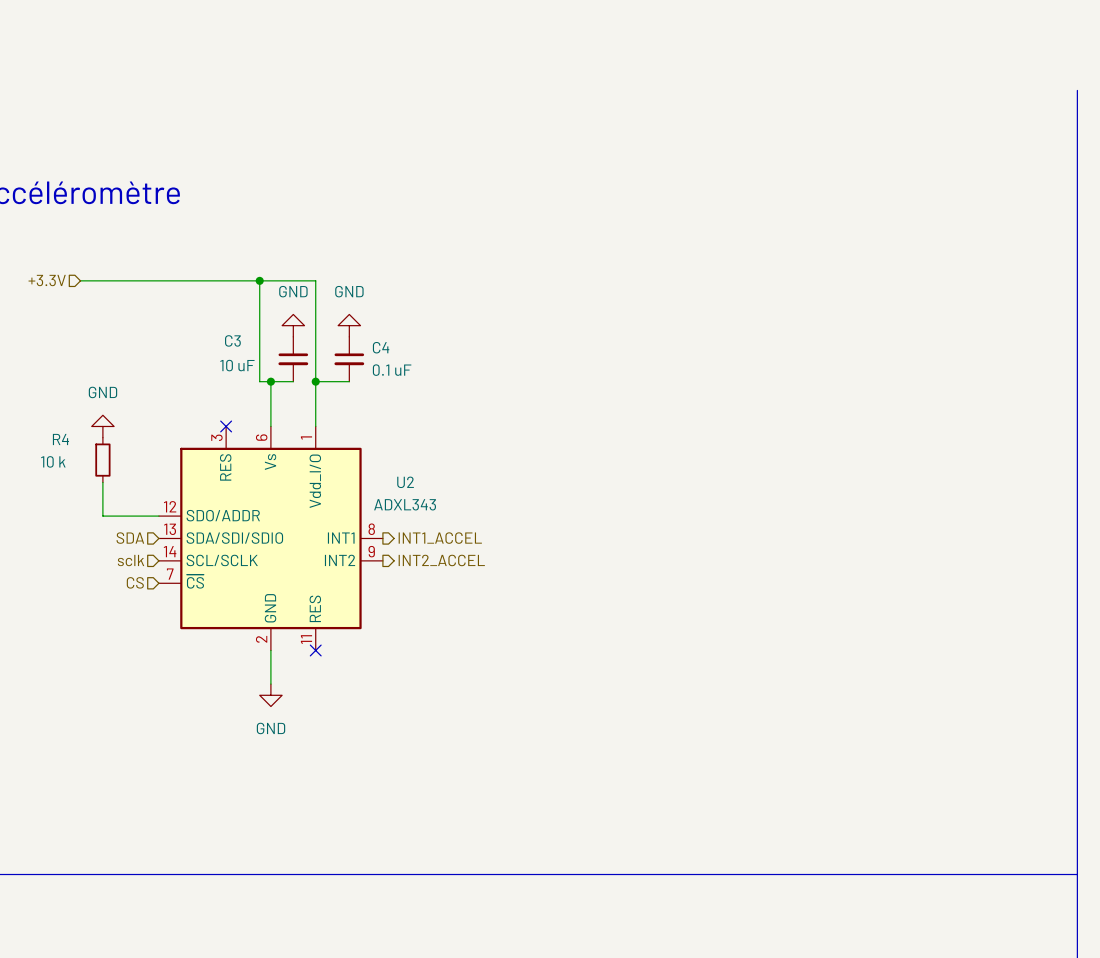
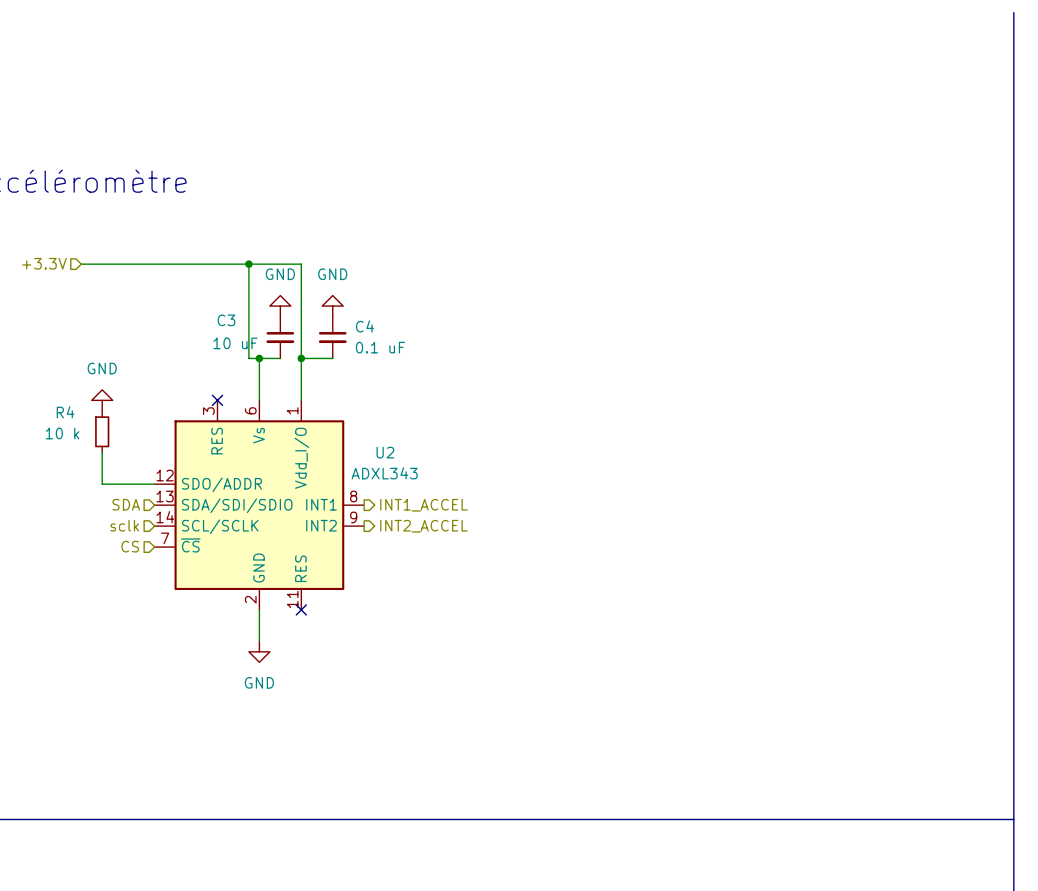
line: none -> (1013, 12) (1013, 86)

